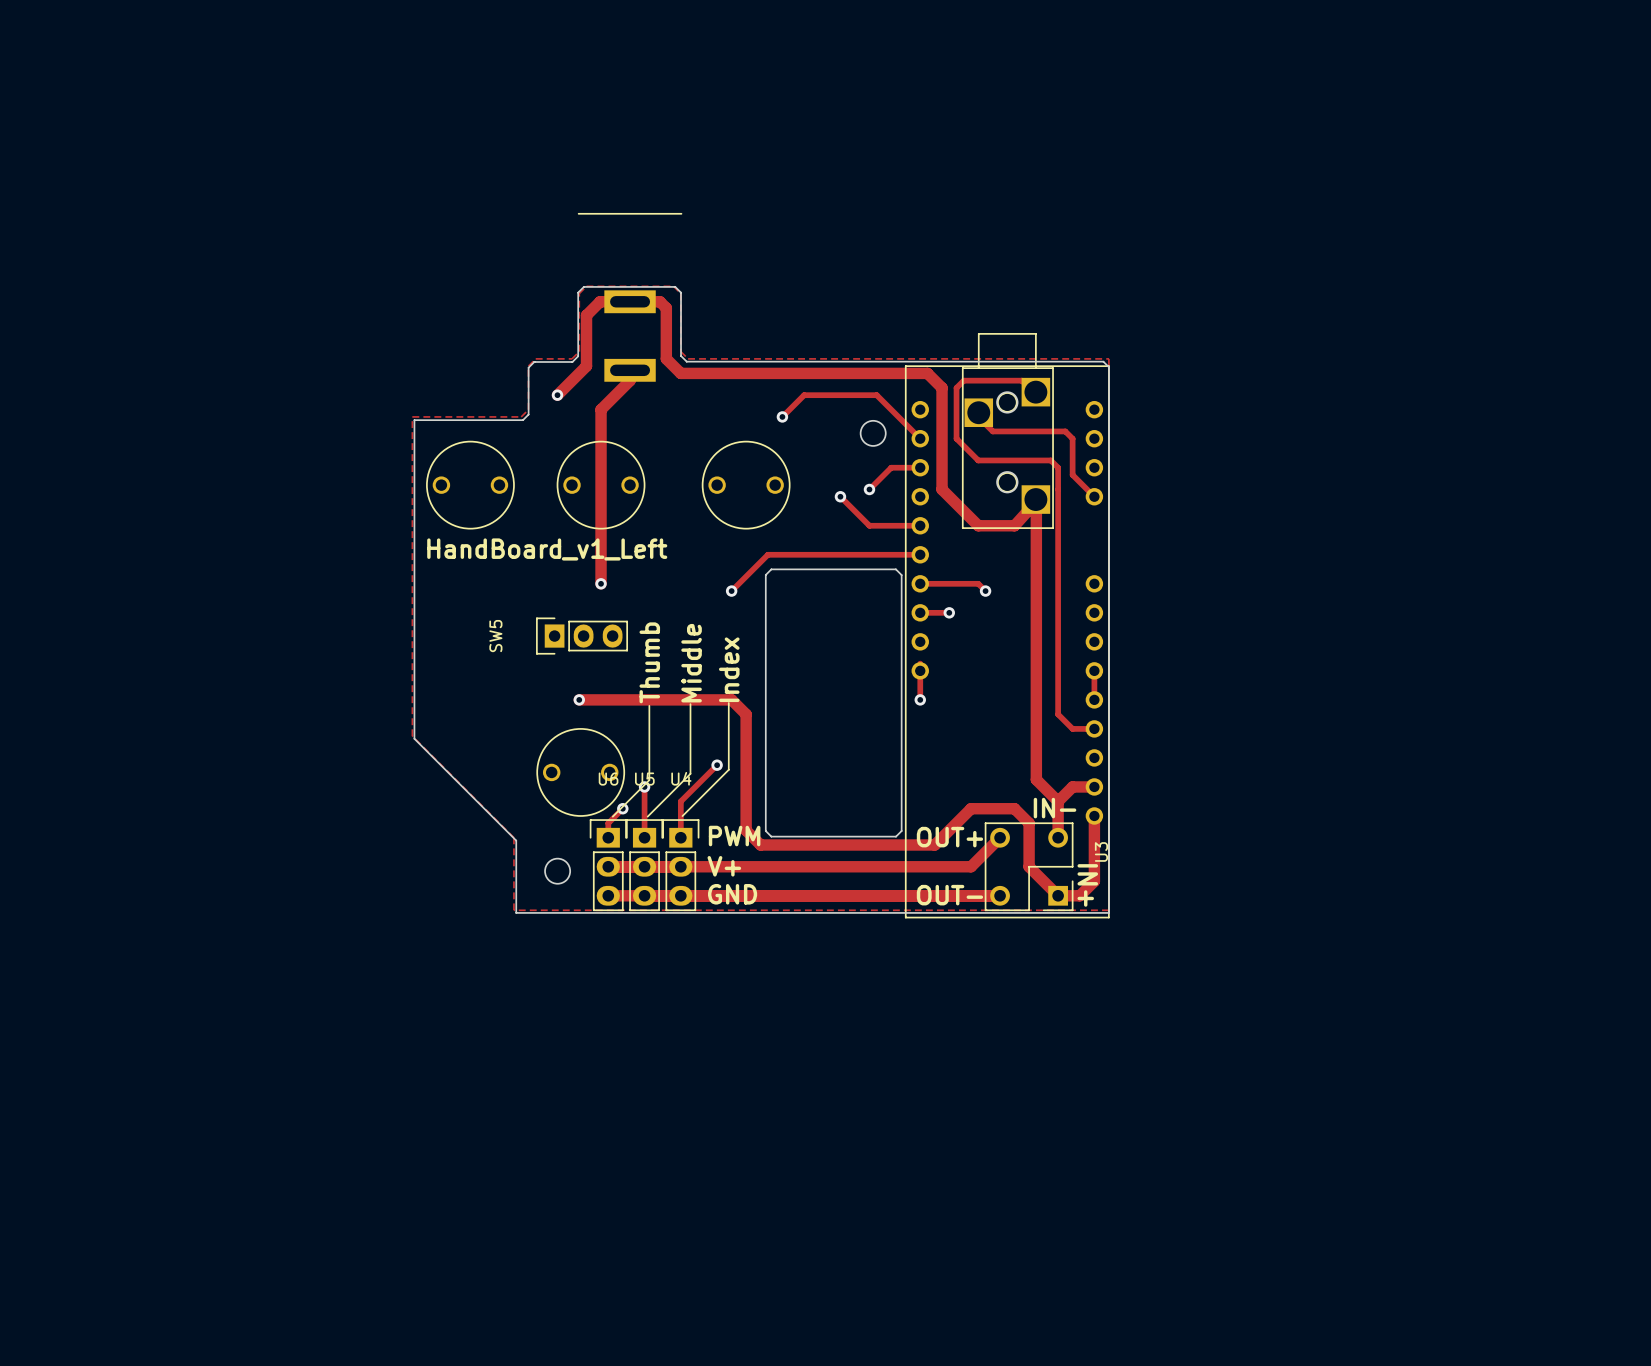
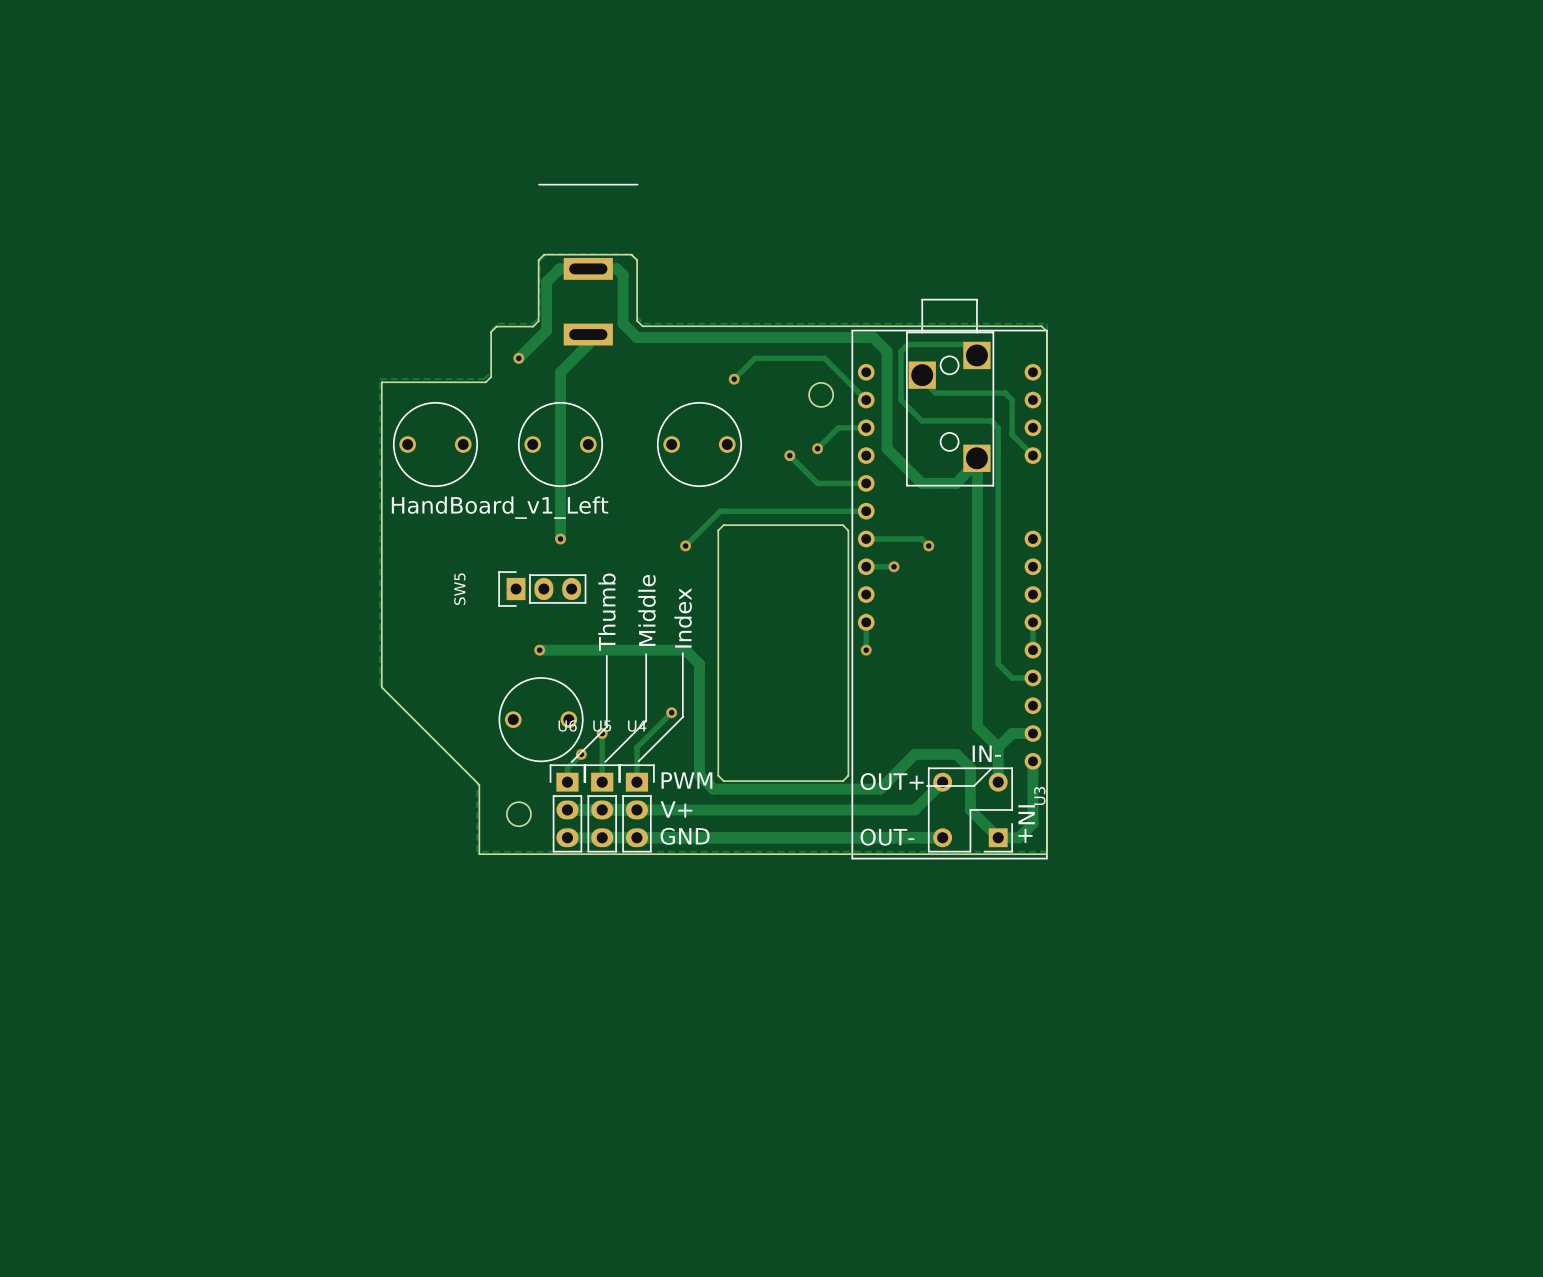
round board edge: [996, 391, 1019, 414] -> none
round board edge: [996, 471, 1019, 494] -> none
line: none -> (991, 769) (974, 786) (927, 786)

